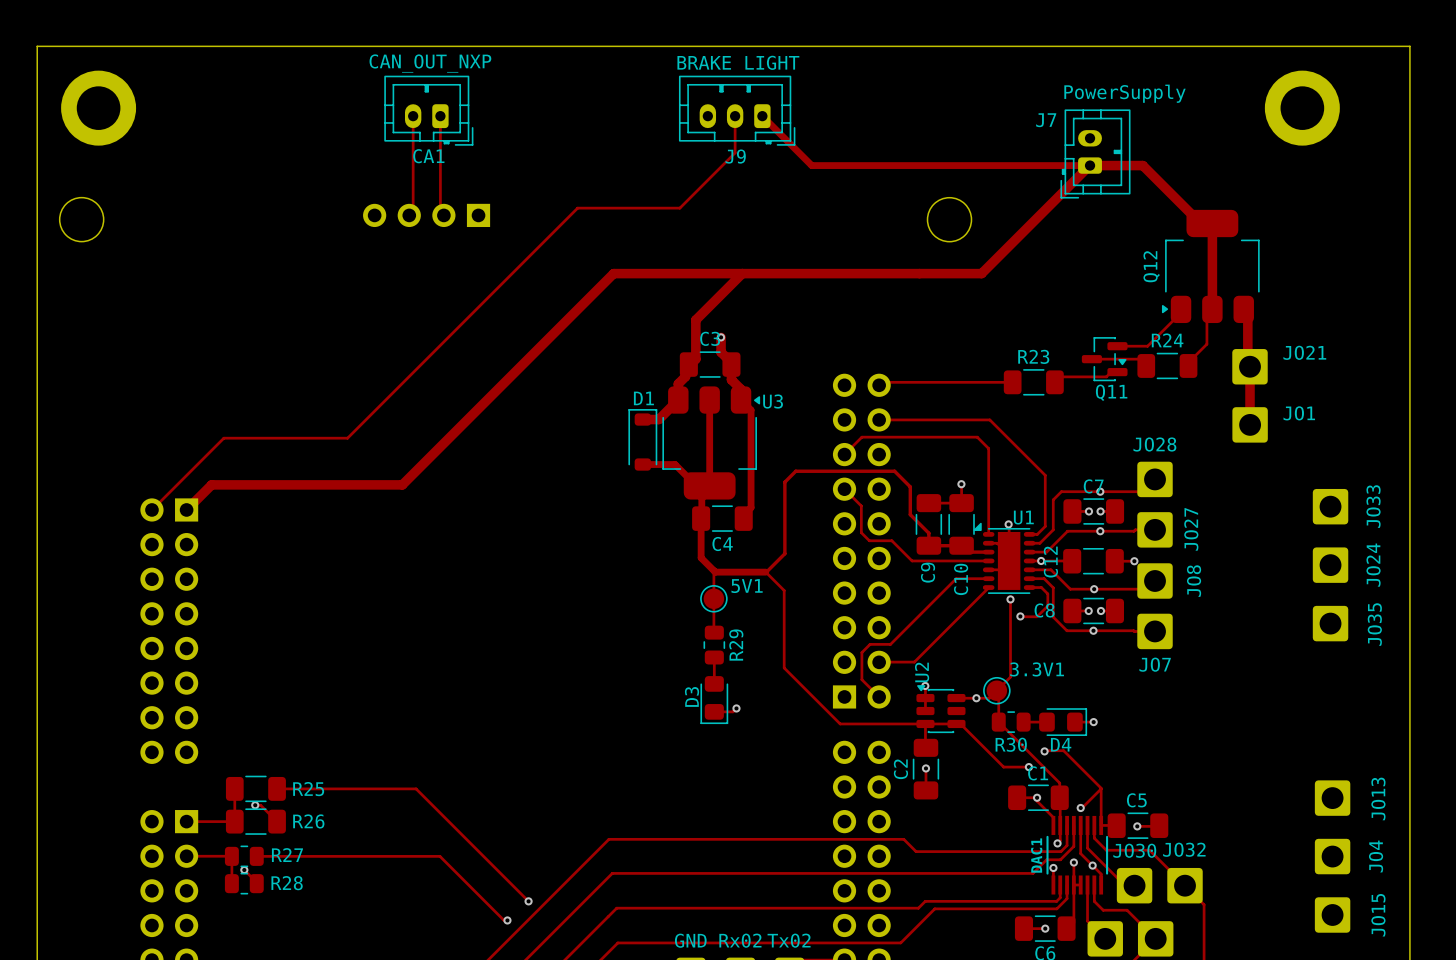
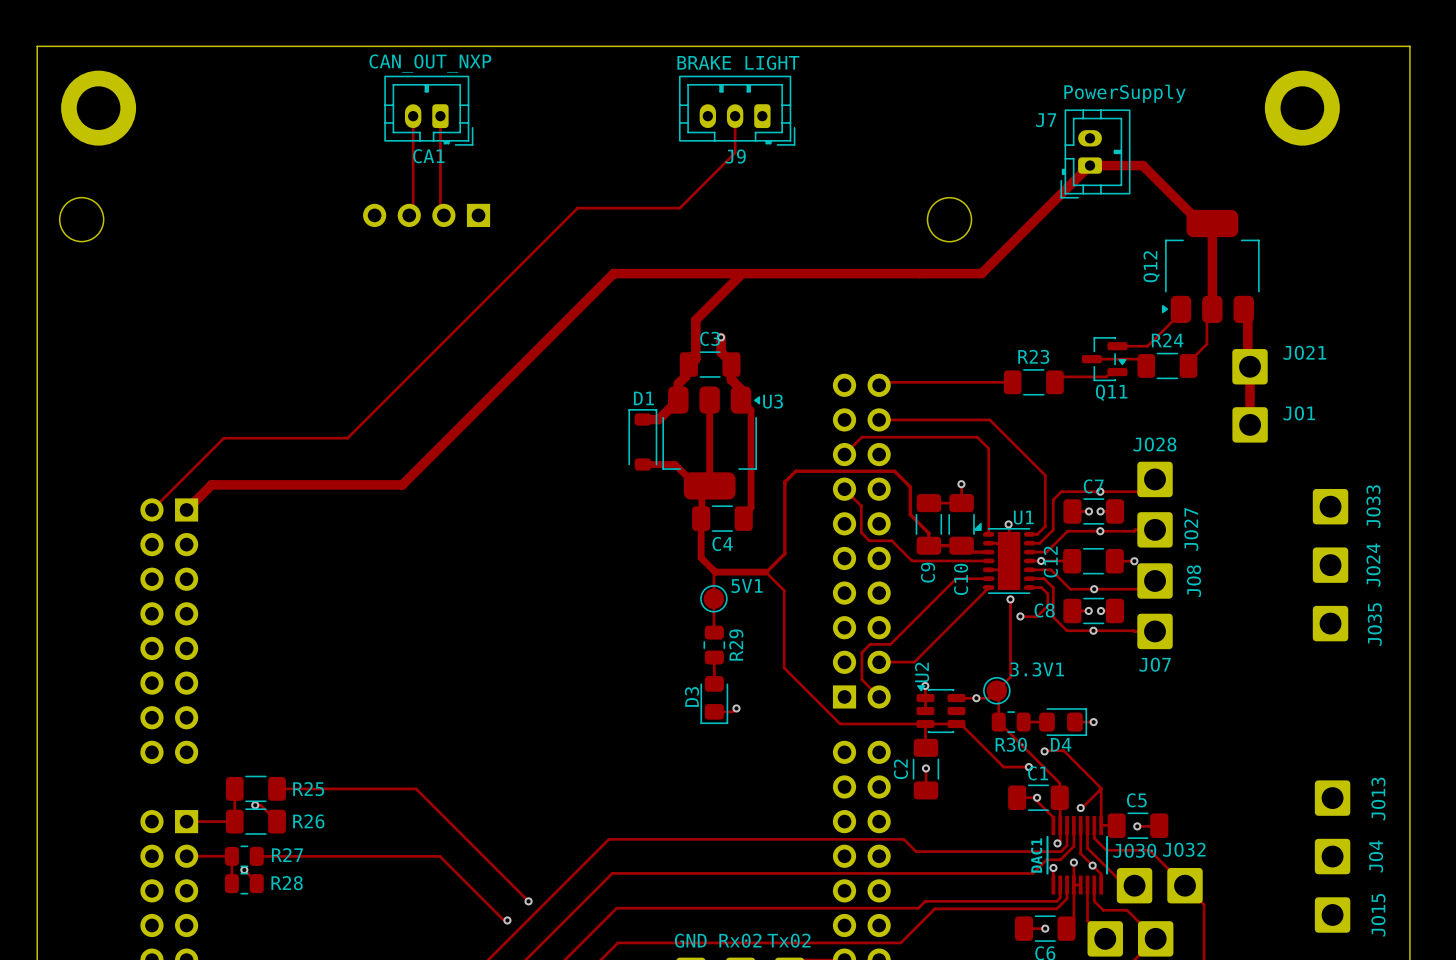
track: (762, 116) (811, 165) (1090, 165) -> none

